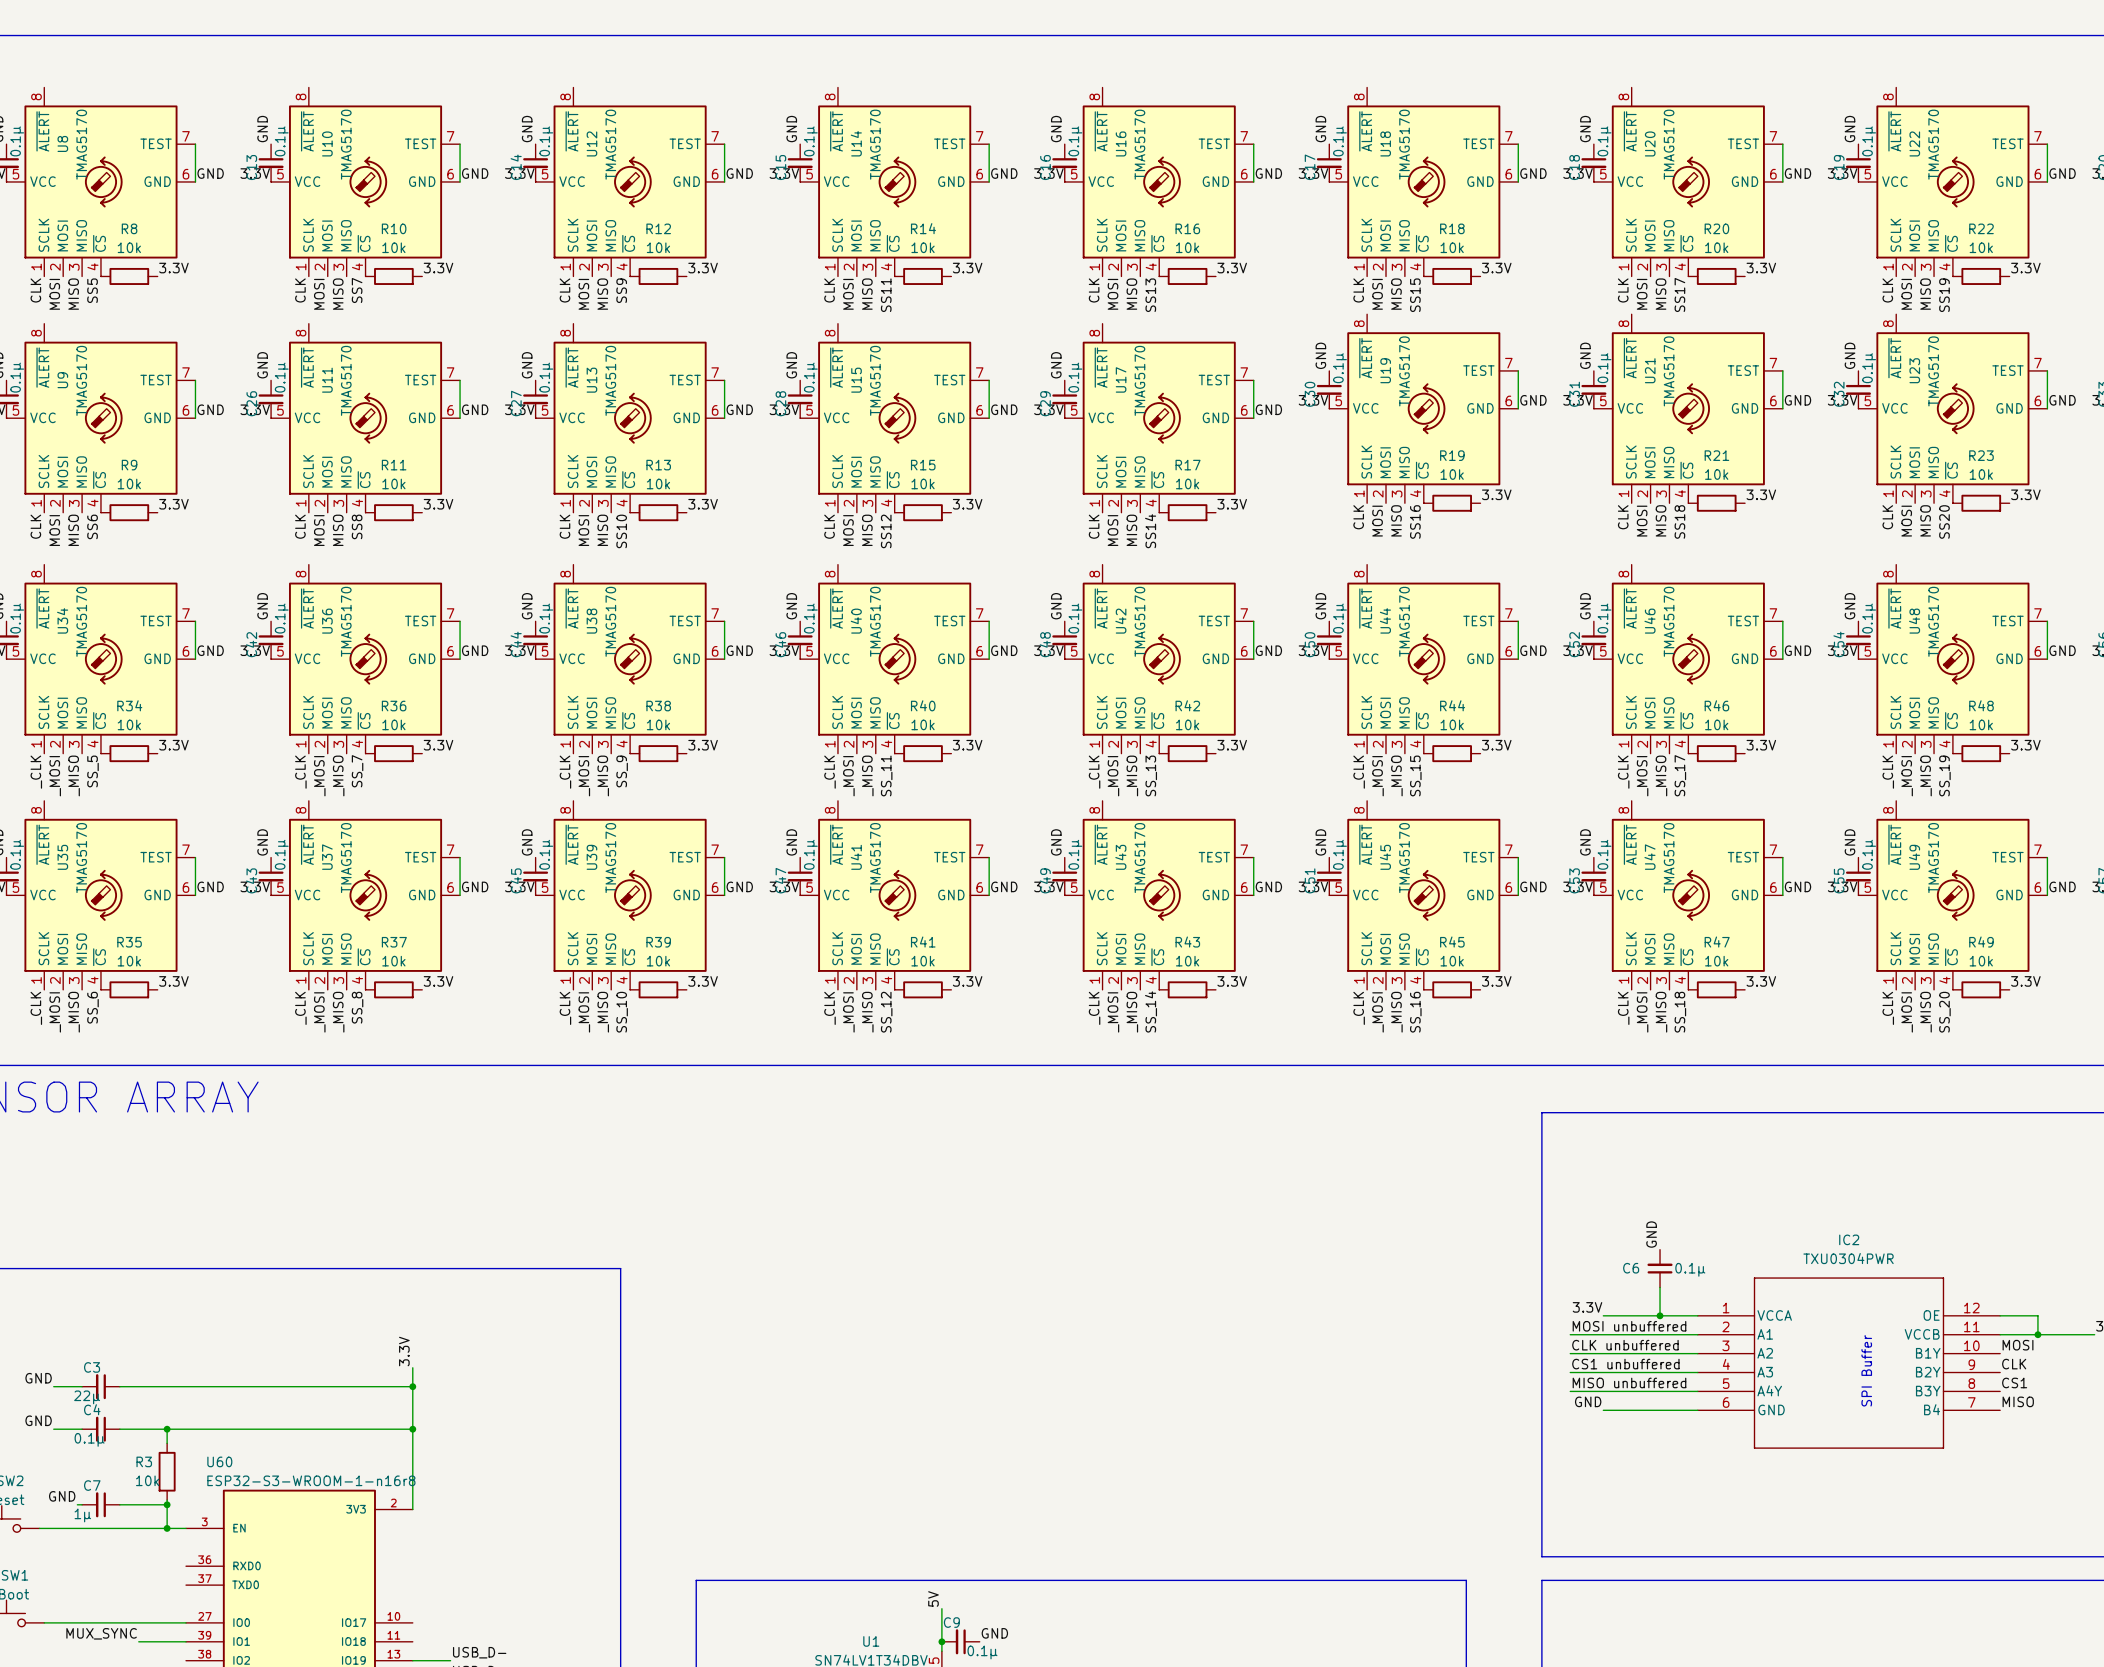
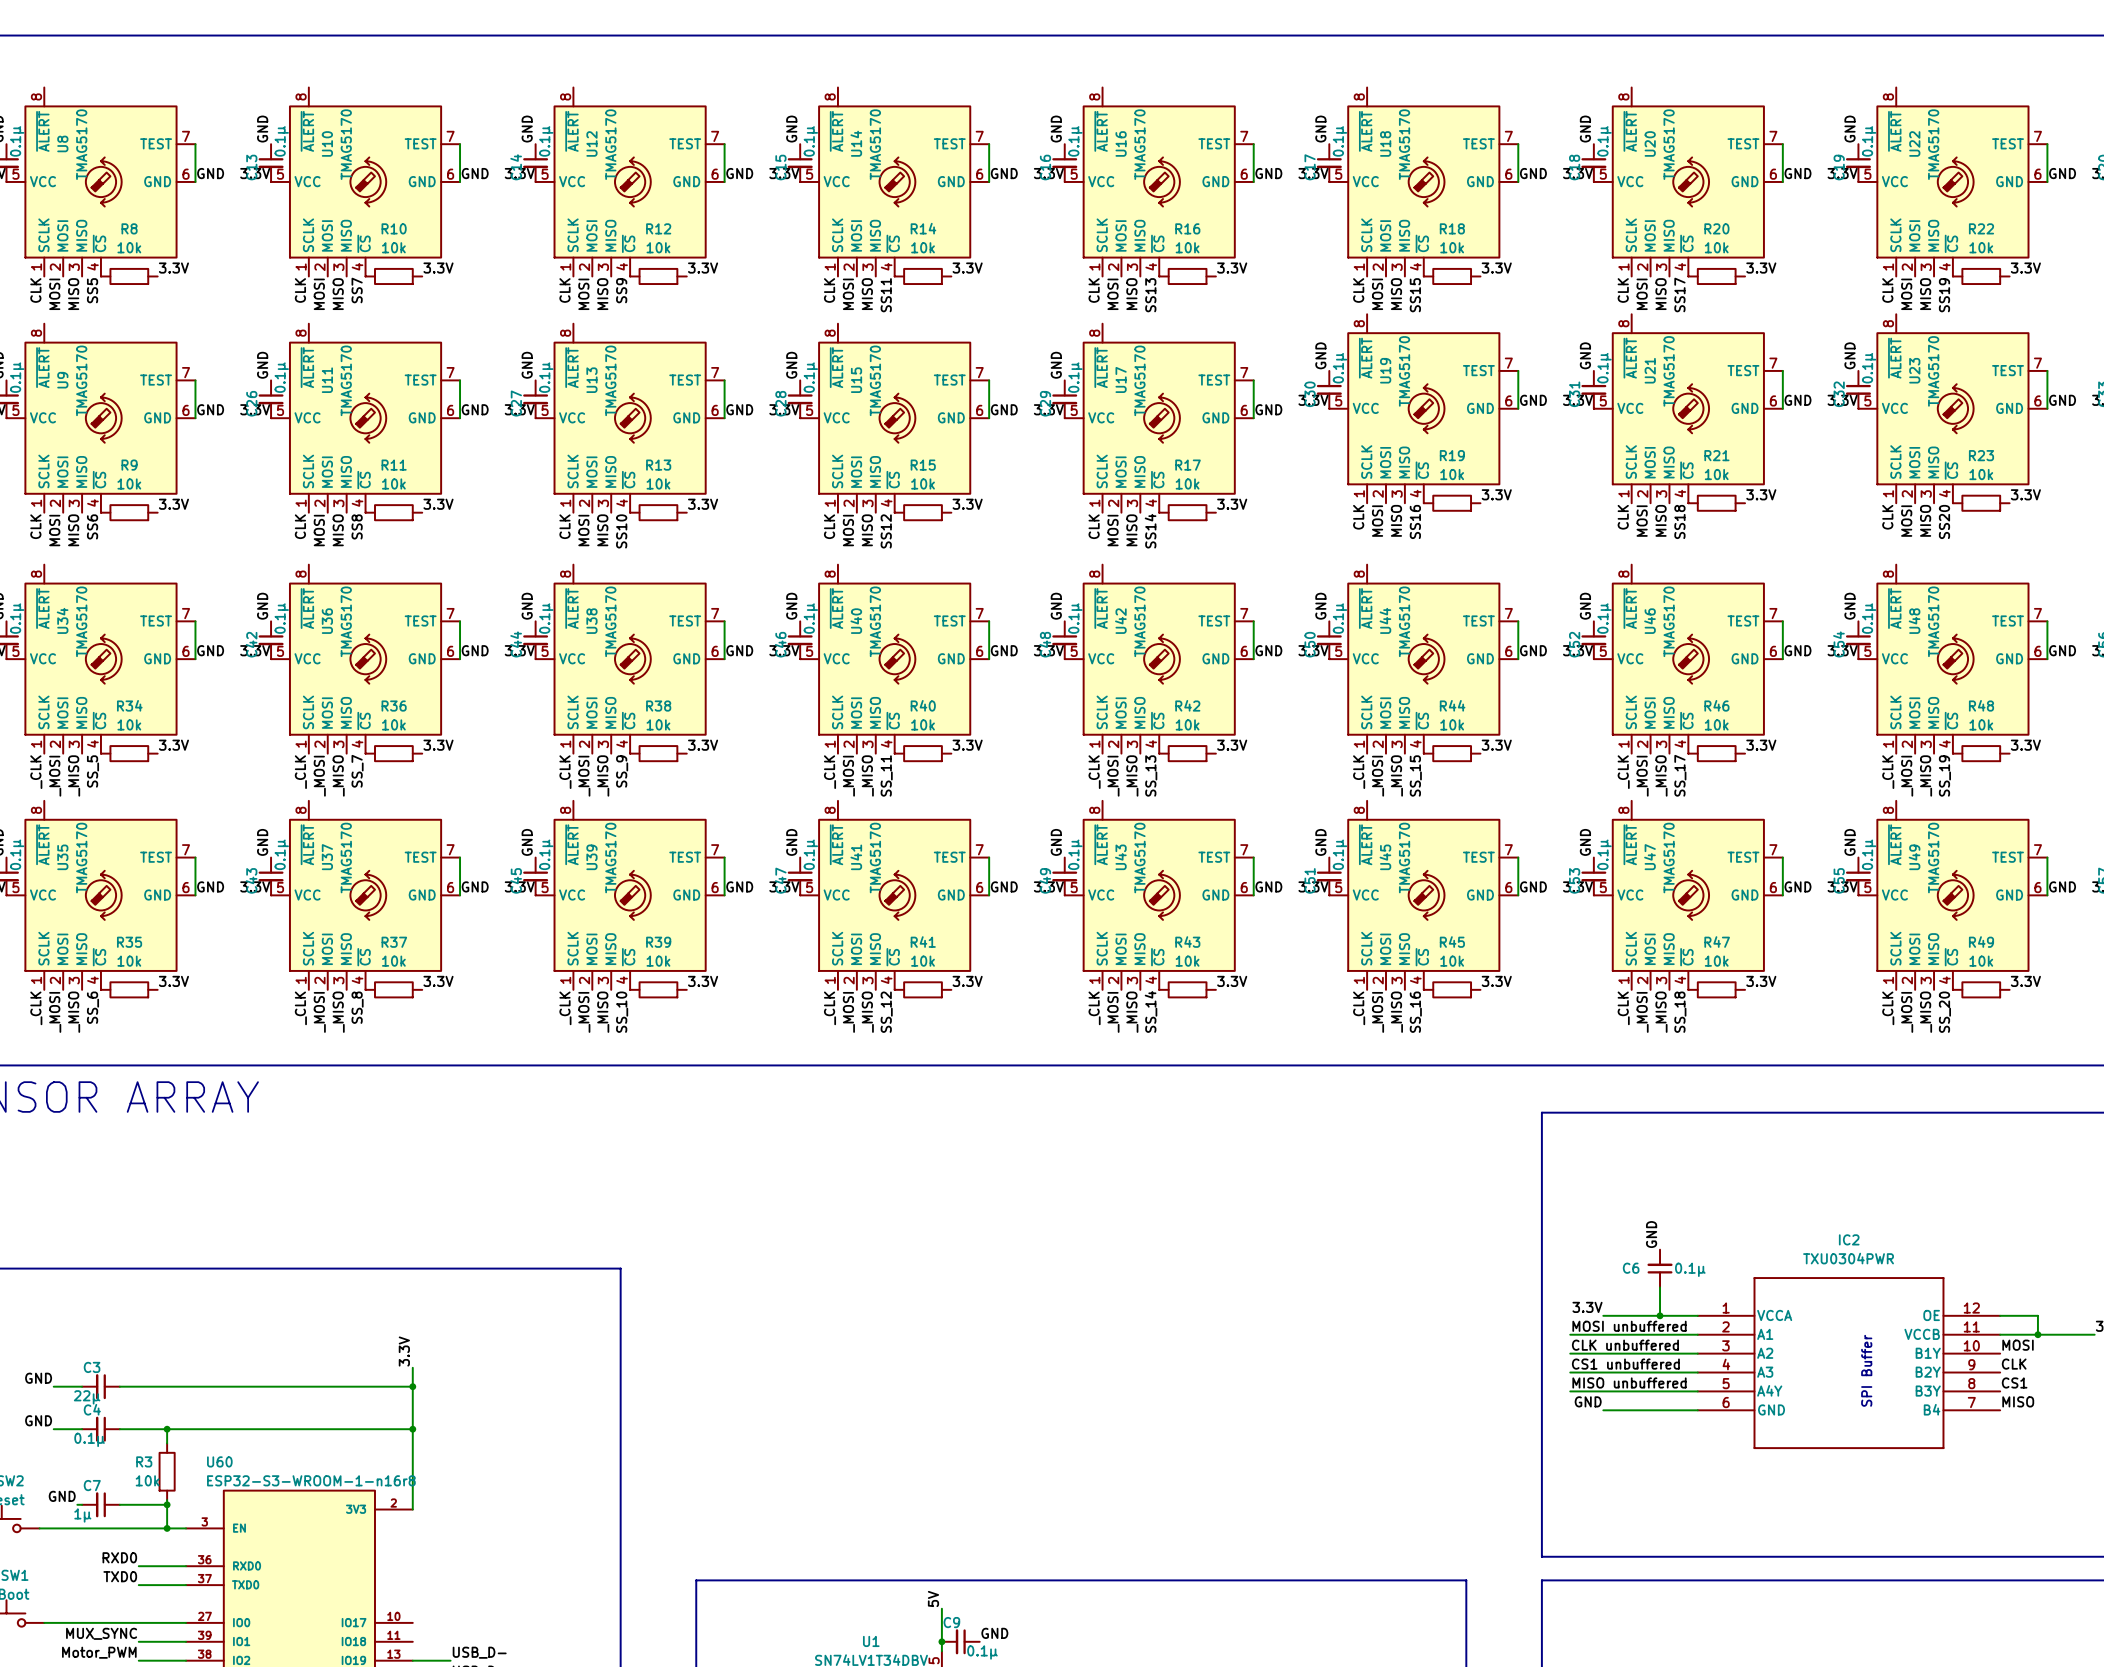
label: none -> RXD0 (119, 1557)
wire: none -> (138, 1566) (186, 1566)
label: none -> TXD0 (120, 1576)
wire: none -> (138, 1585) (186, 1585)
label: none -> Motor_PWM (99, 1652)
wire: none -> (138, 1660) (186, 1660)

